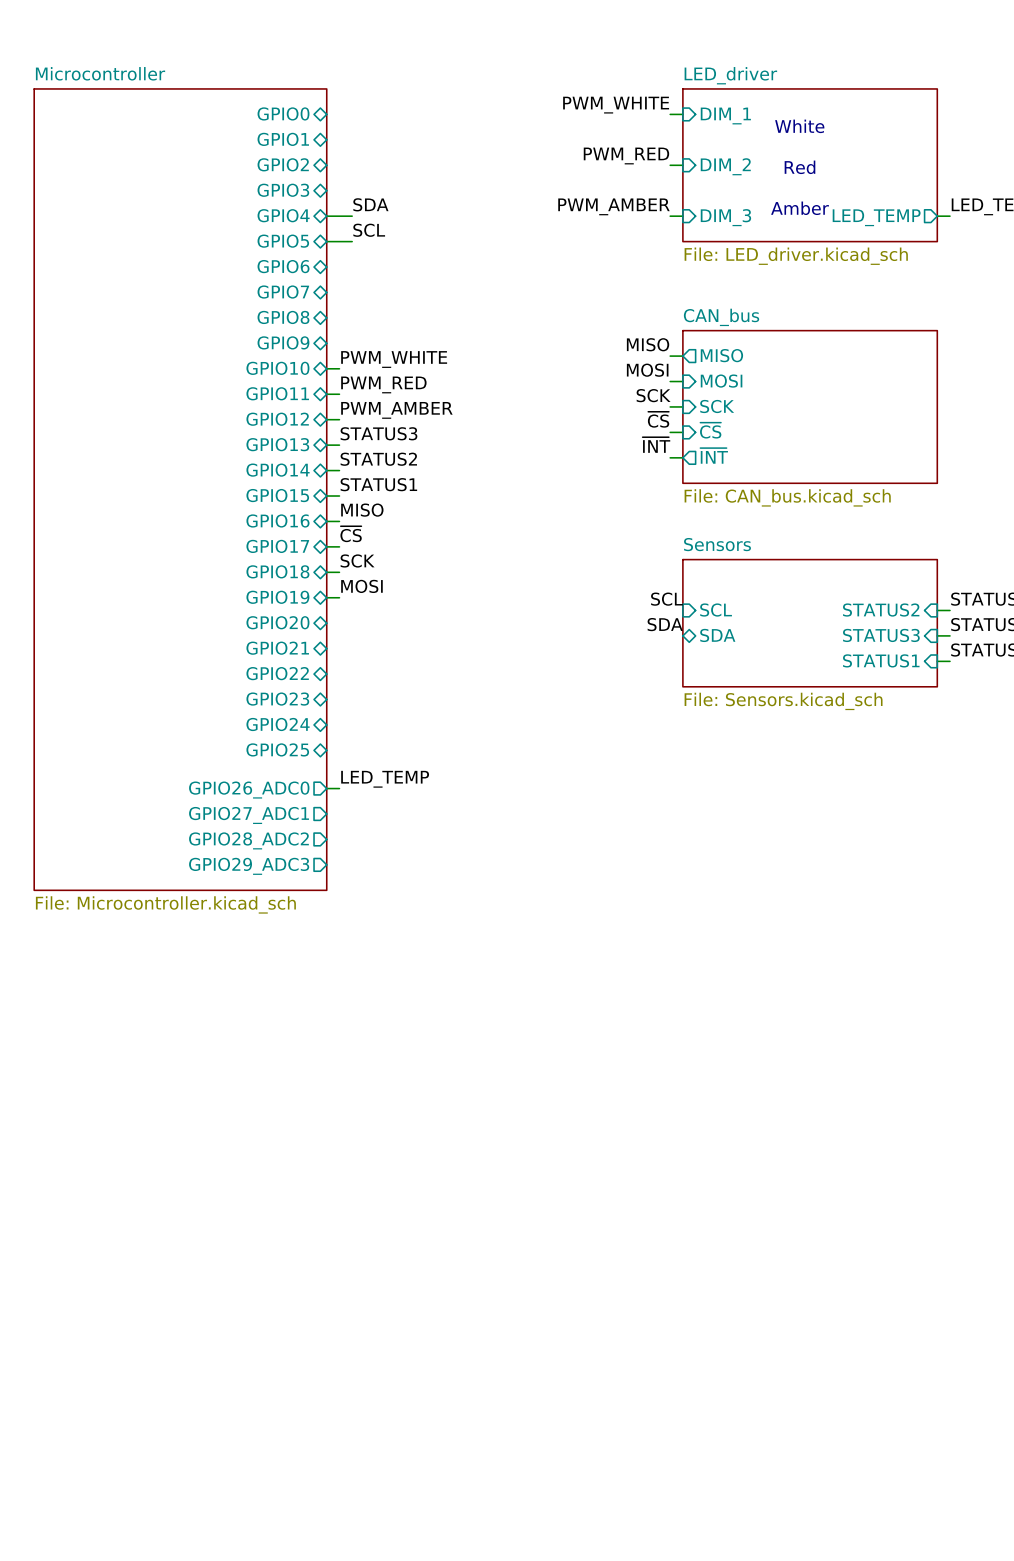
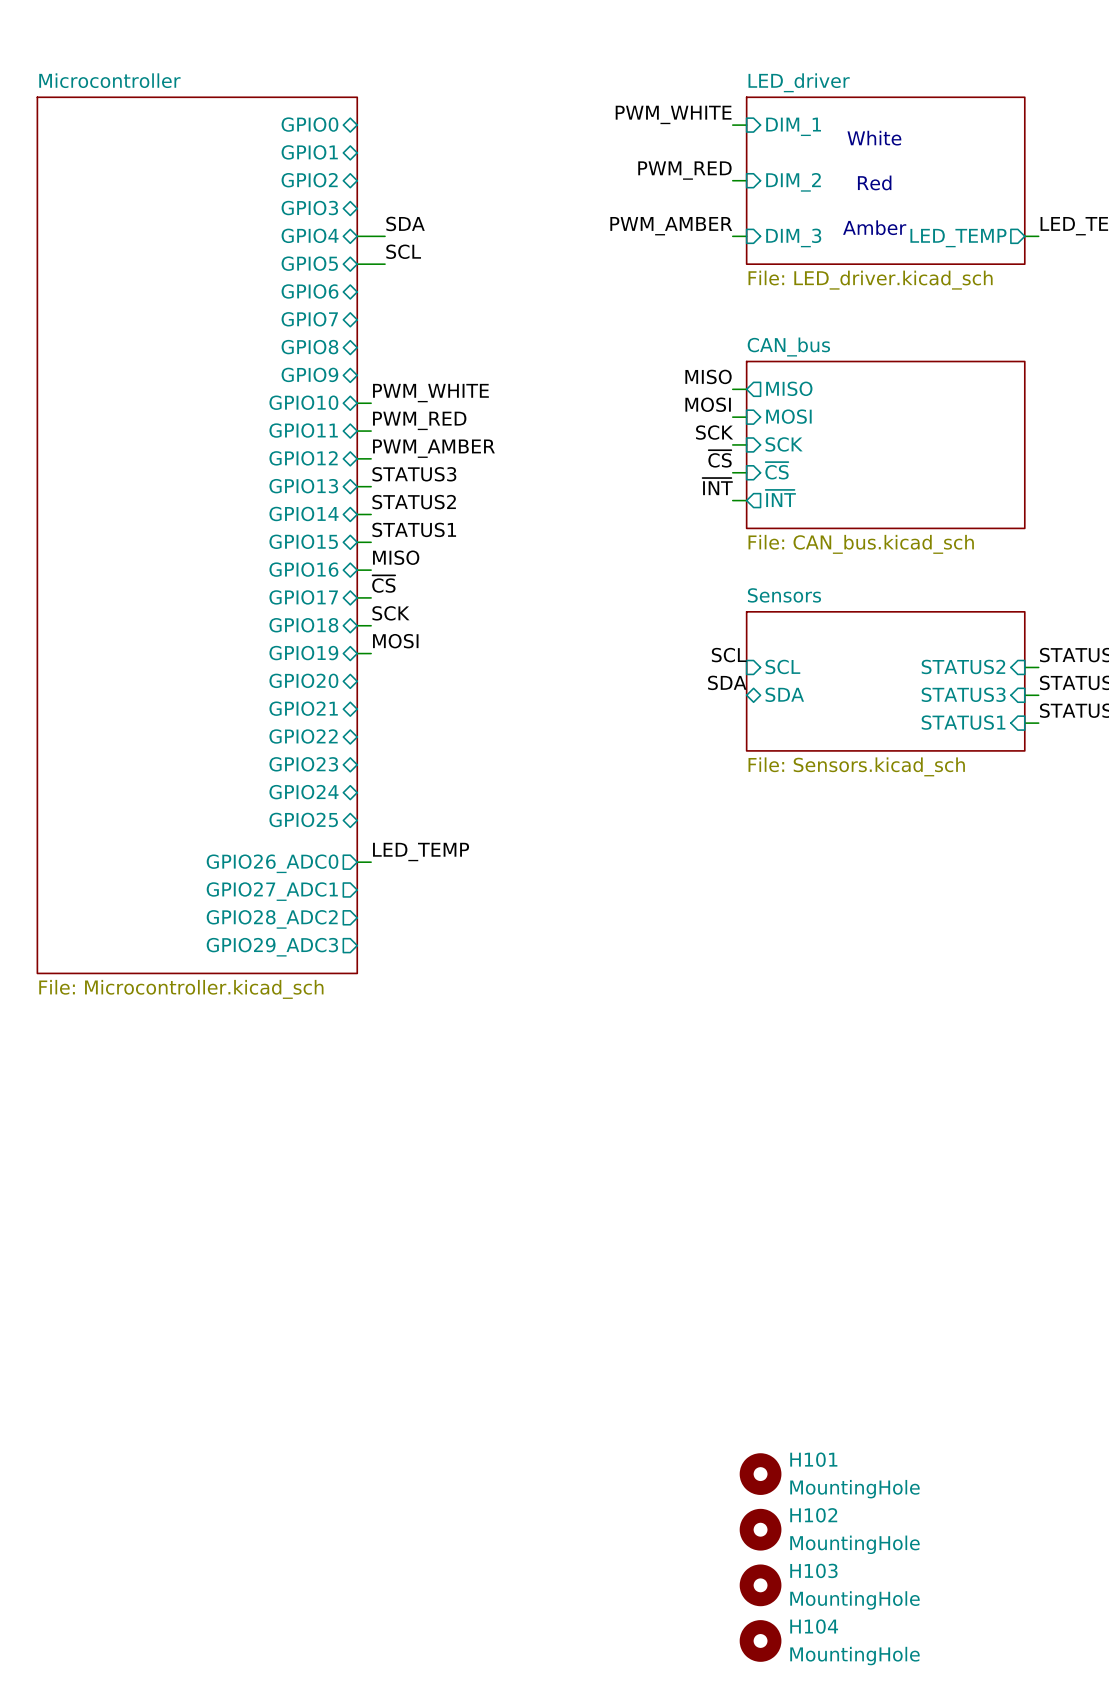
H101: none -> MountingHole (760, 1474)
H102: none -> MountingHole (760, 1529)
H103: none -> MountingHole (760, 1585)
H104: none -> MountingHole (760, 1640)

